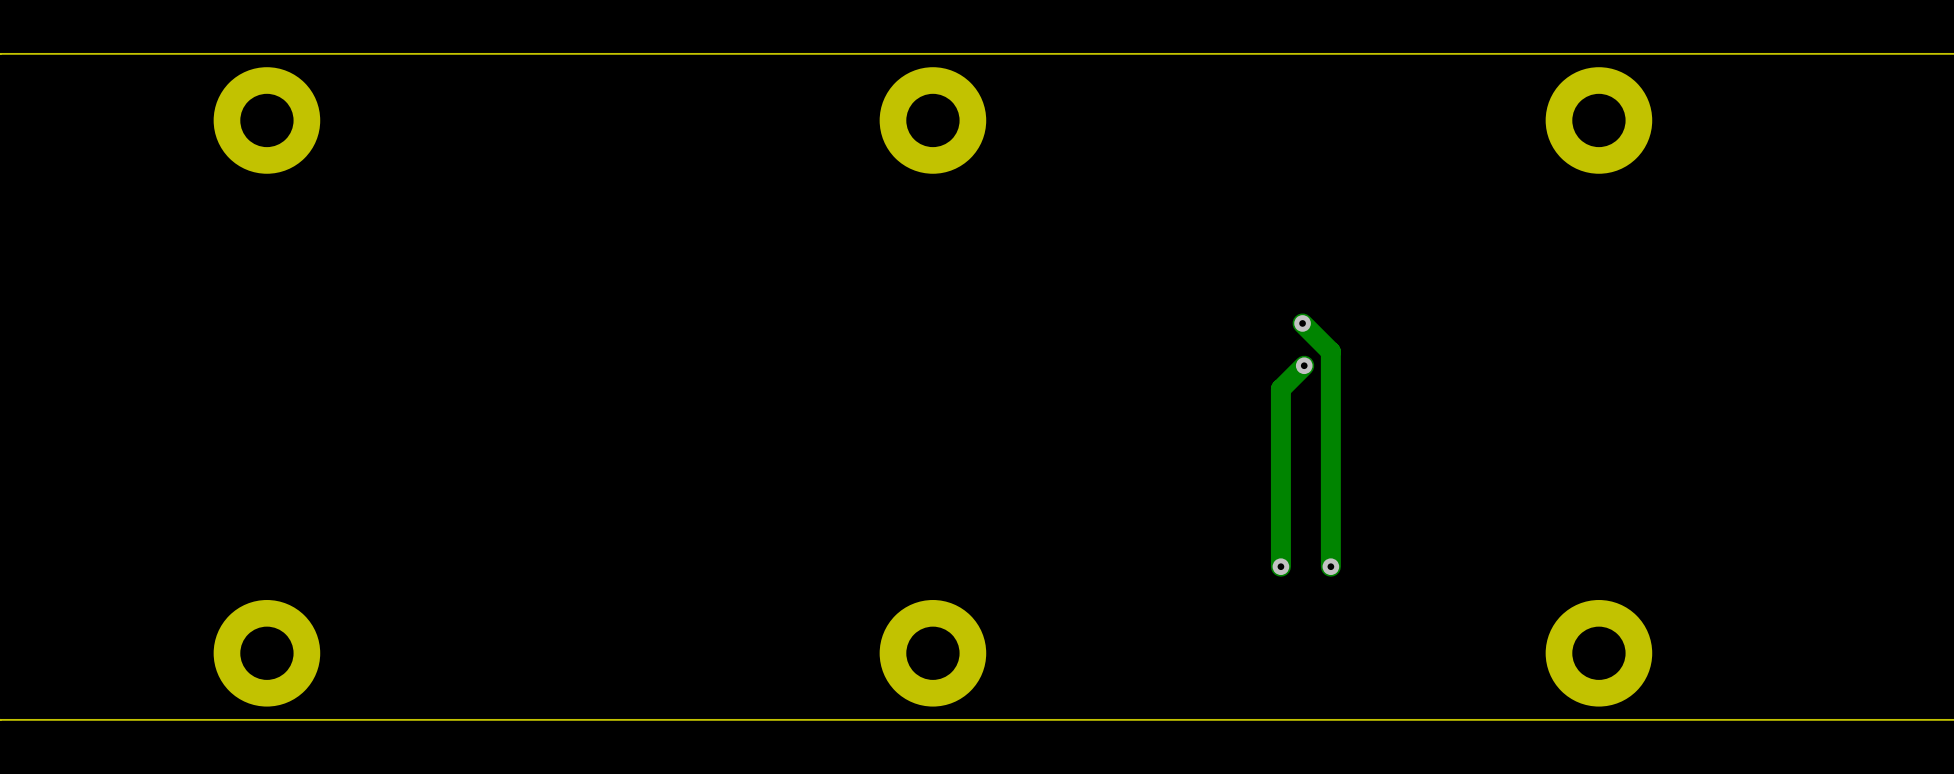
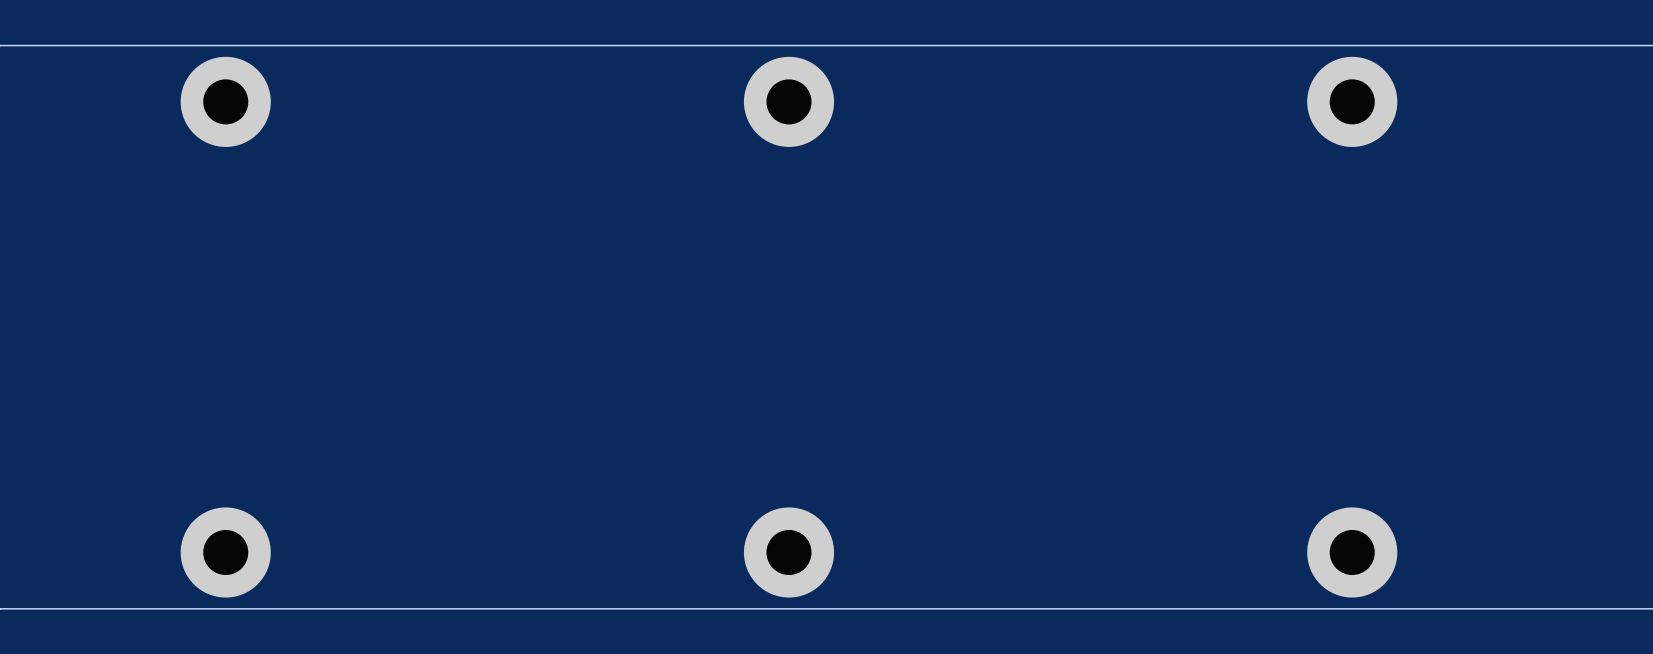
track: (1302, 323) (1330, 351) (1330, 566) -> none
via: (1302, 323) -> none
track: (1304, 365) (1280, 389) (1280, 566) -> none
via: (1304, 365) -> none
via: (1280, 566) -> none
via: (1330, 566) -> none

